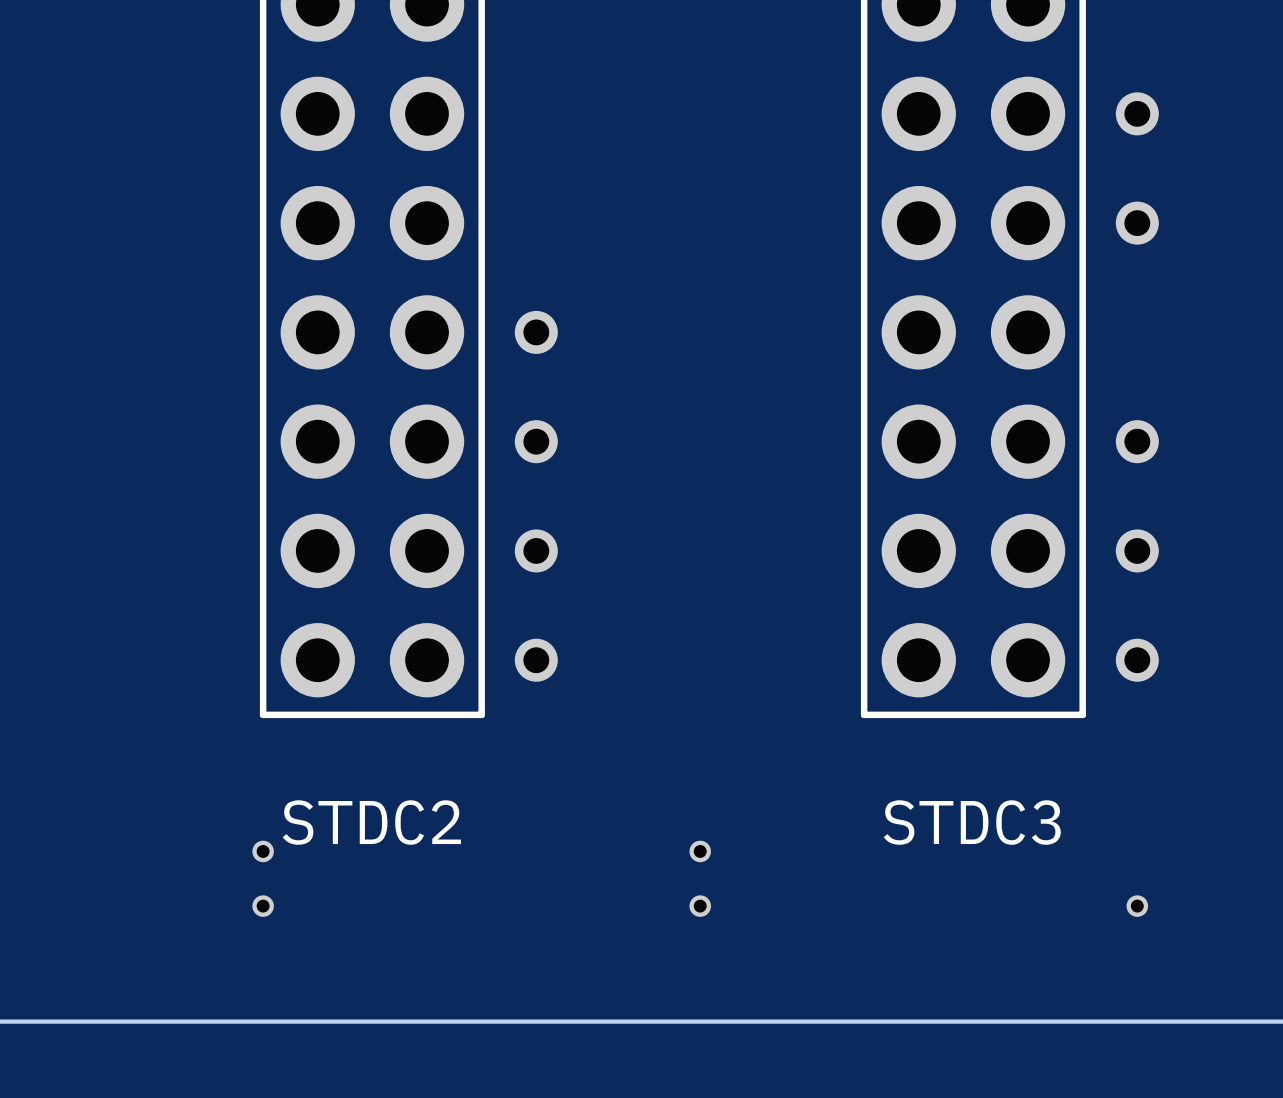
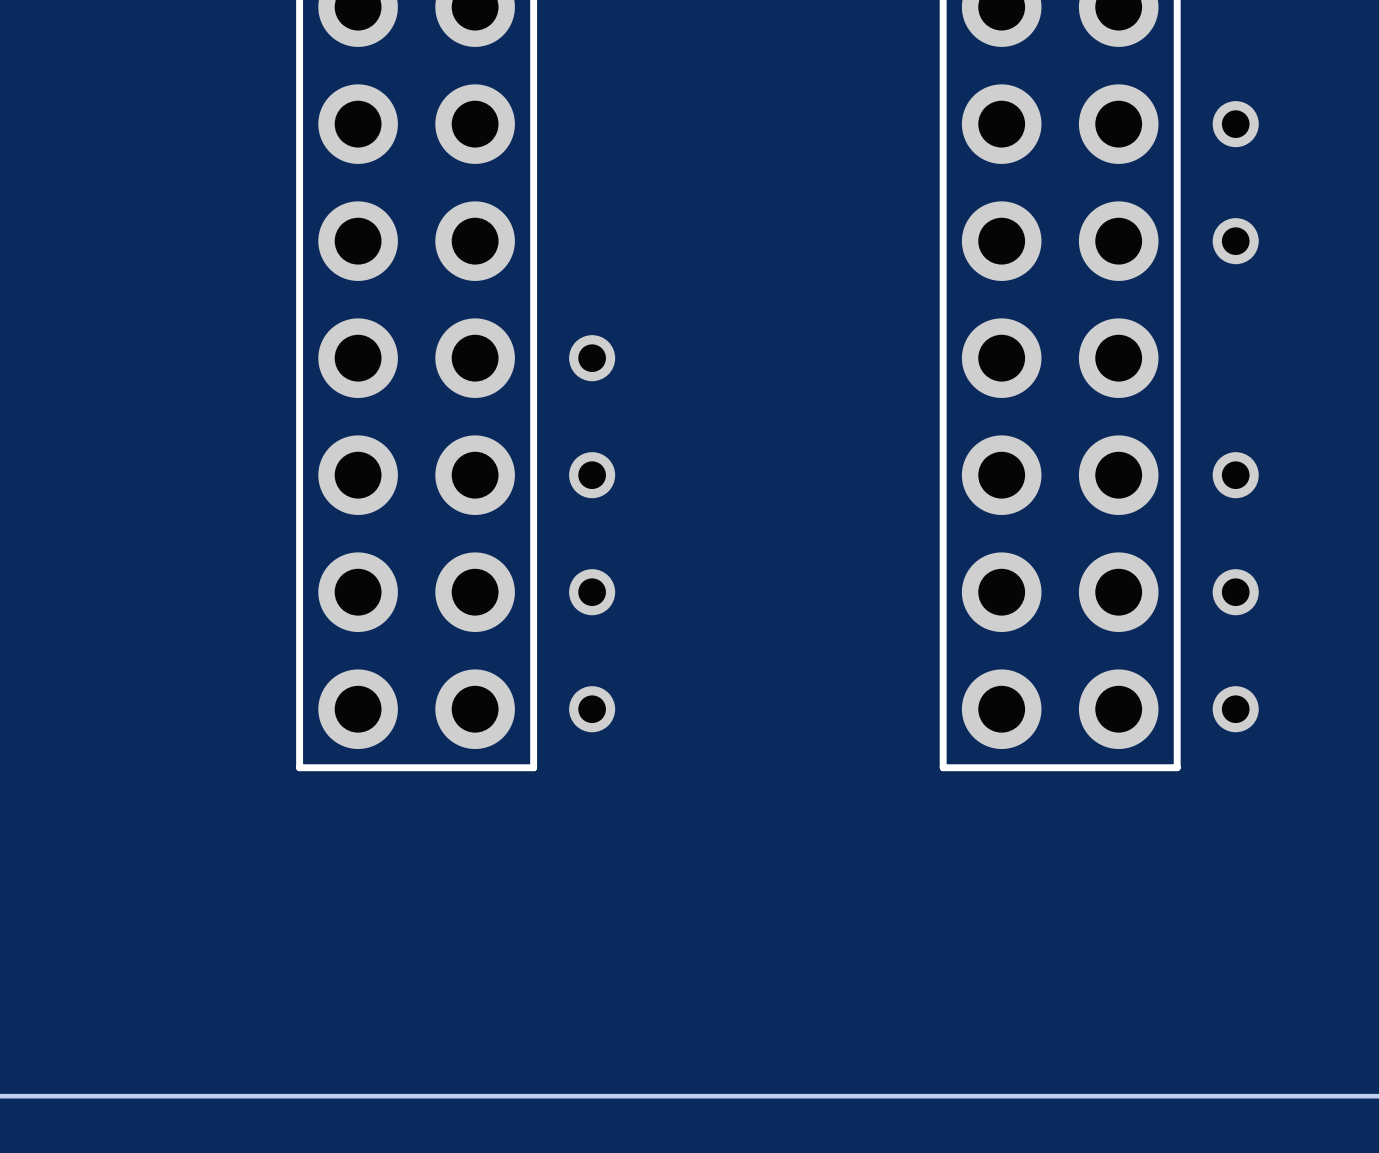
text: STDC2 (371, 822) -> none
text: STDC3 (972, 822) -> none
part: (263, 851) -> none
part: (700, 851) -> none
part: (263, 906) -> none
part: (700, 906) -> none
part: (1137, 906) -> none

